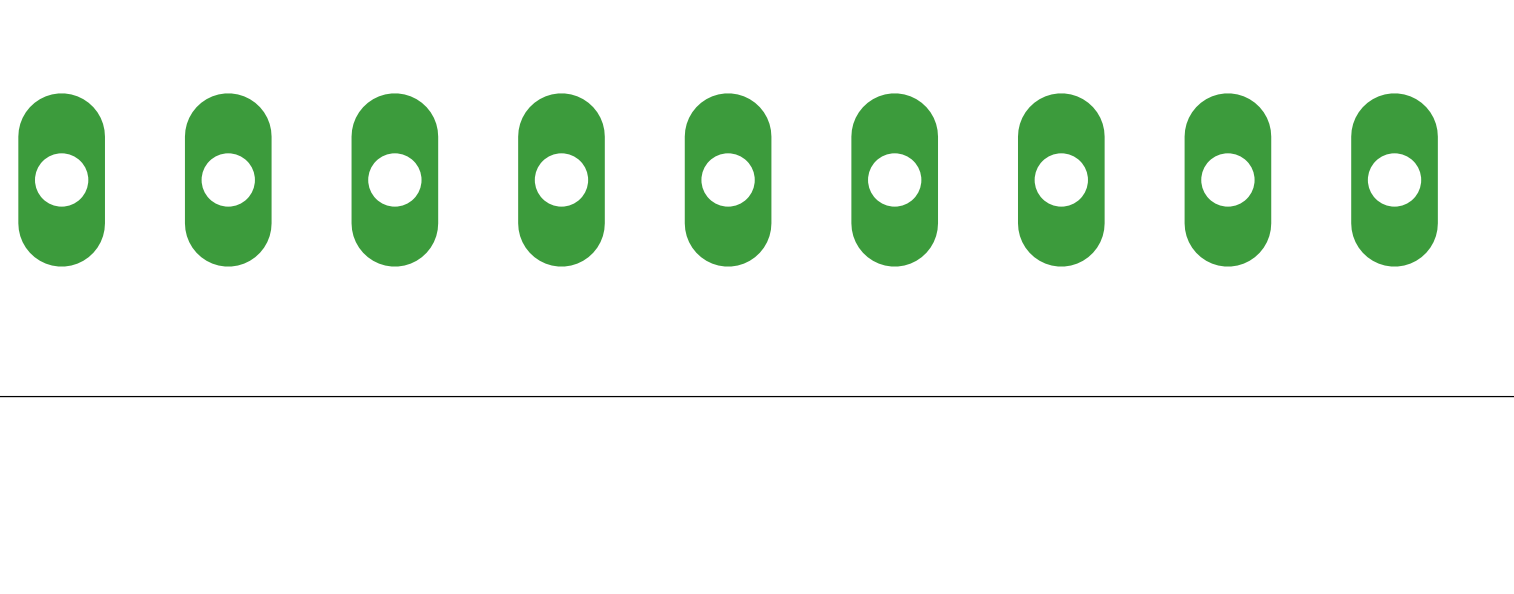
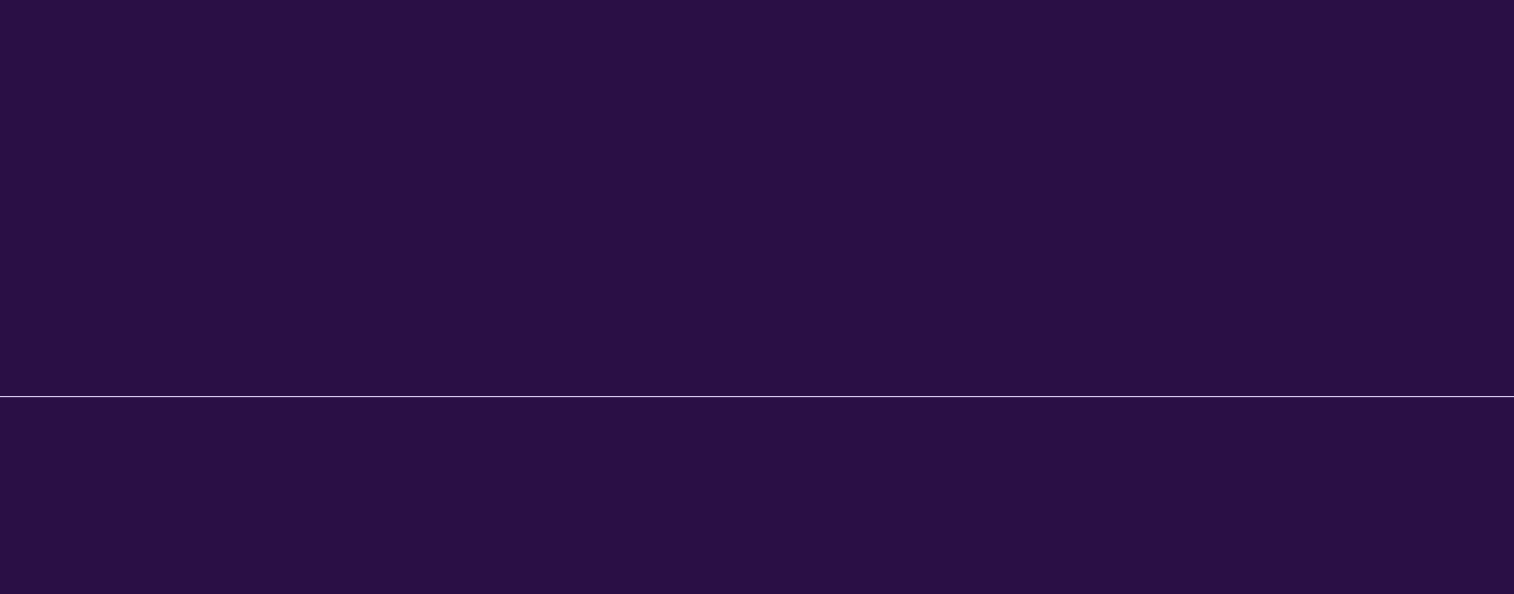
part: (728, 179) -> none

